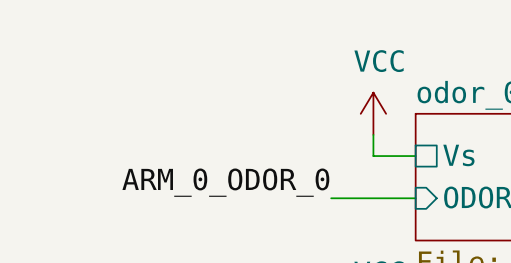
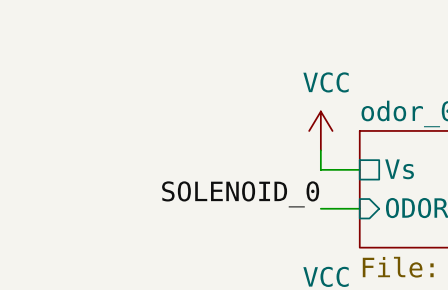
label: ARM_0_ODOR_0 (225, 182) -> none
label: none -> SOLENOID_0 (240, 194)
wire: (331, 198) (373, 198) -> none

